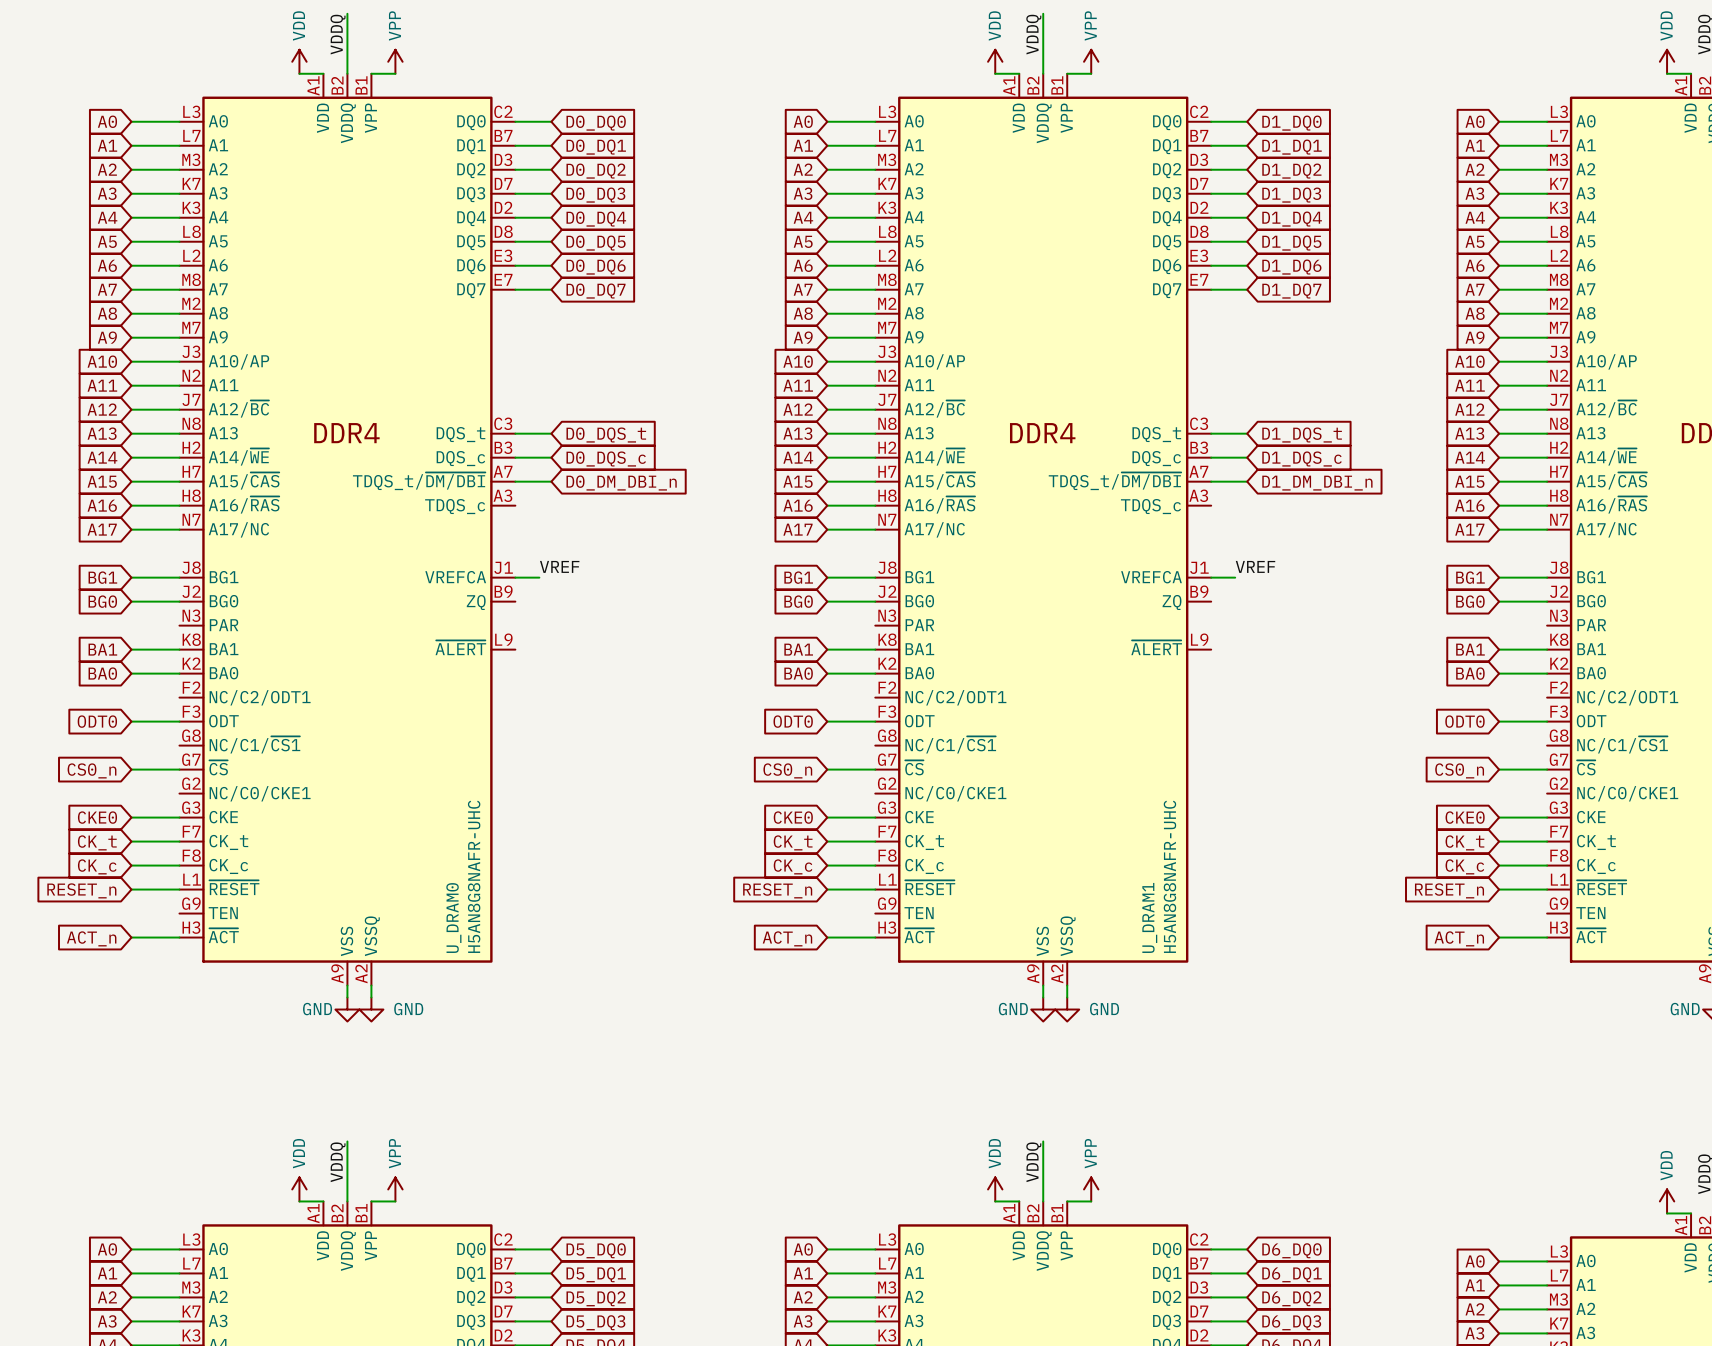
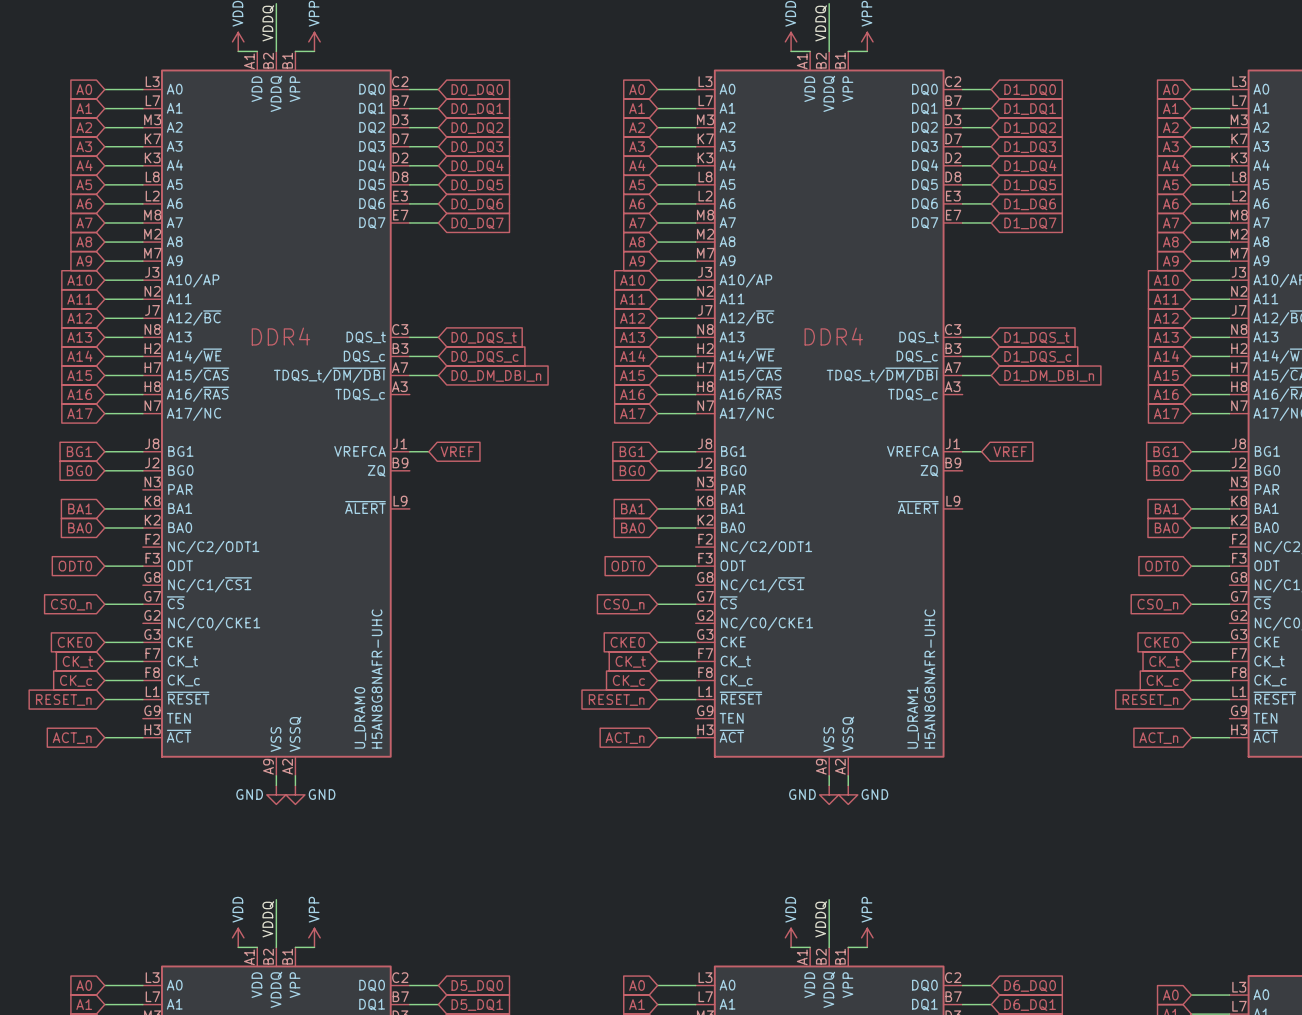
label: VREF (559, 566) -> none
label: VREF (1255, 566) -> none
global label: none -> VREF (457, 451)
global label: none -> VREF (1010, 451)

